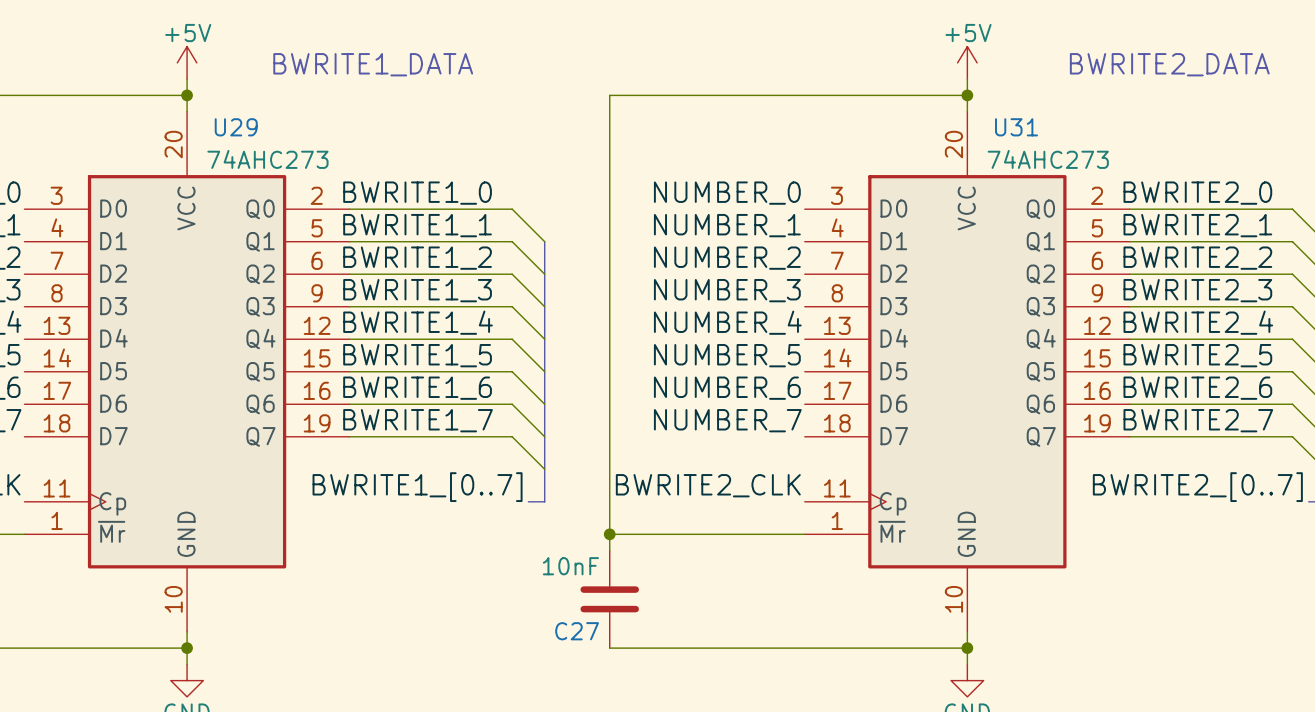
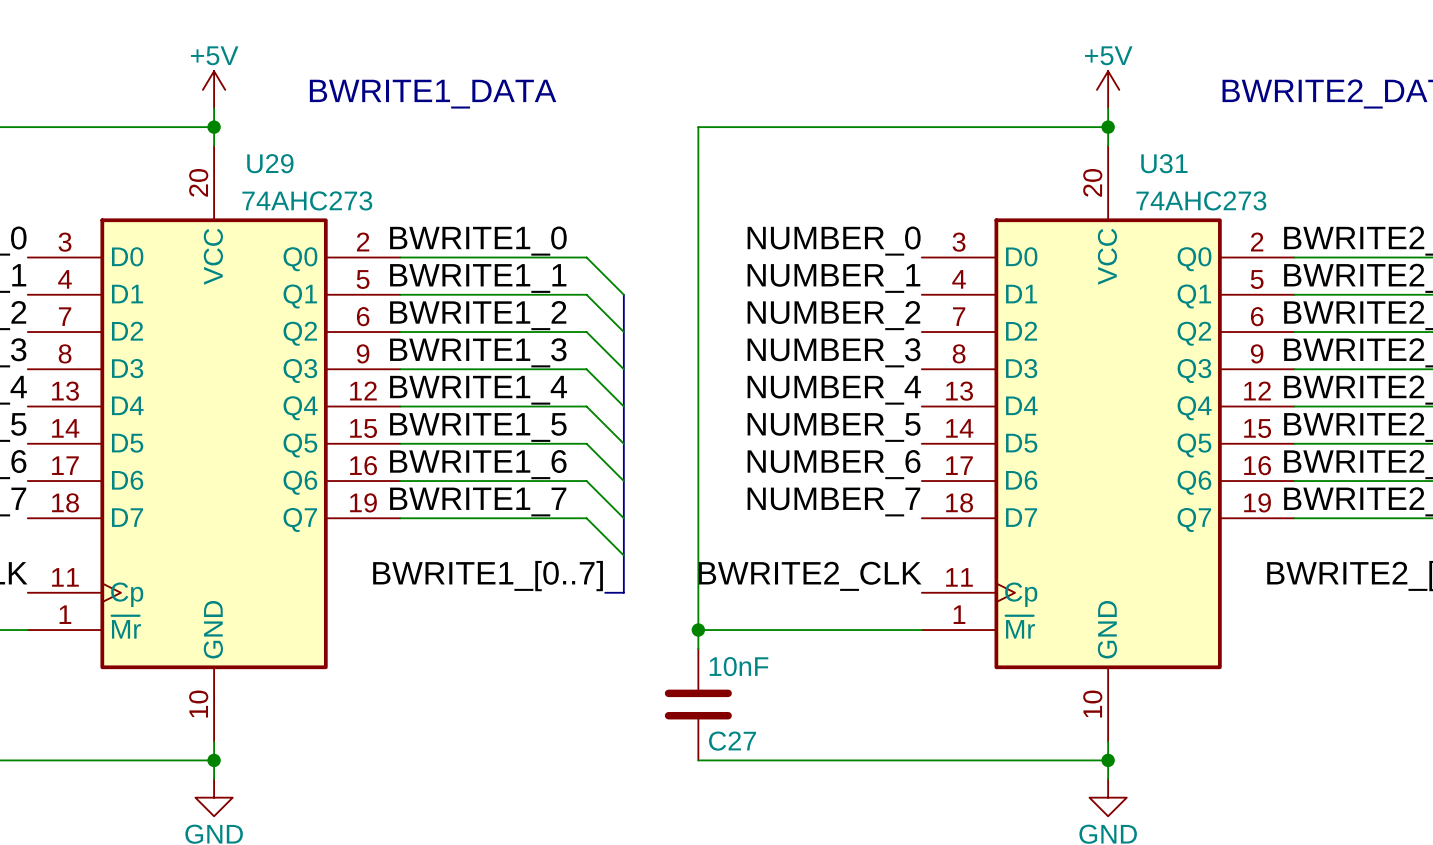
C27 value position: 10nF (570, 566) -> 10nF (739, 666)
C27 name position: C27 (577, 631) -> C27 (732, 741)

